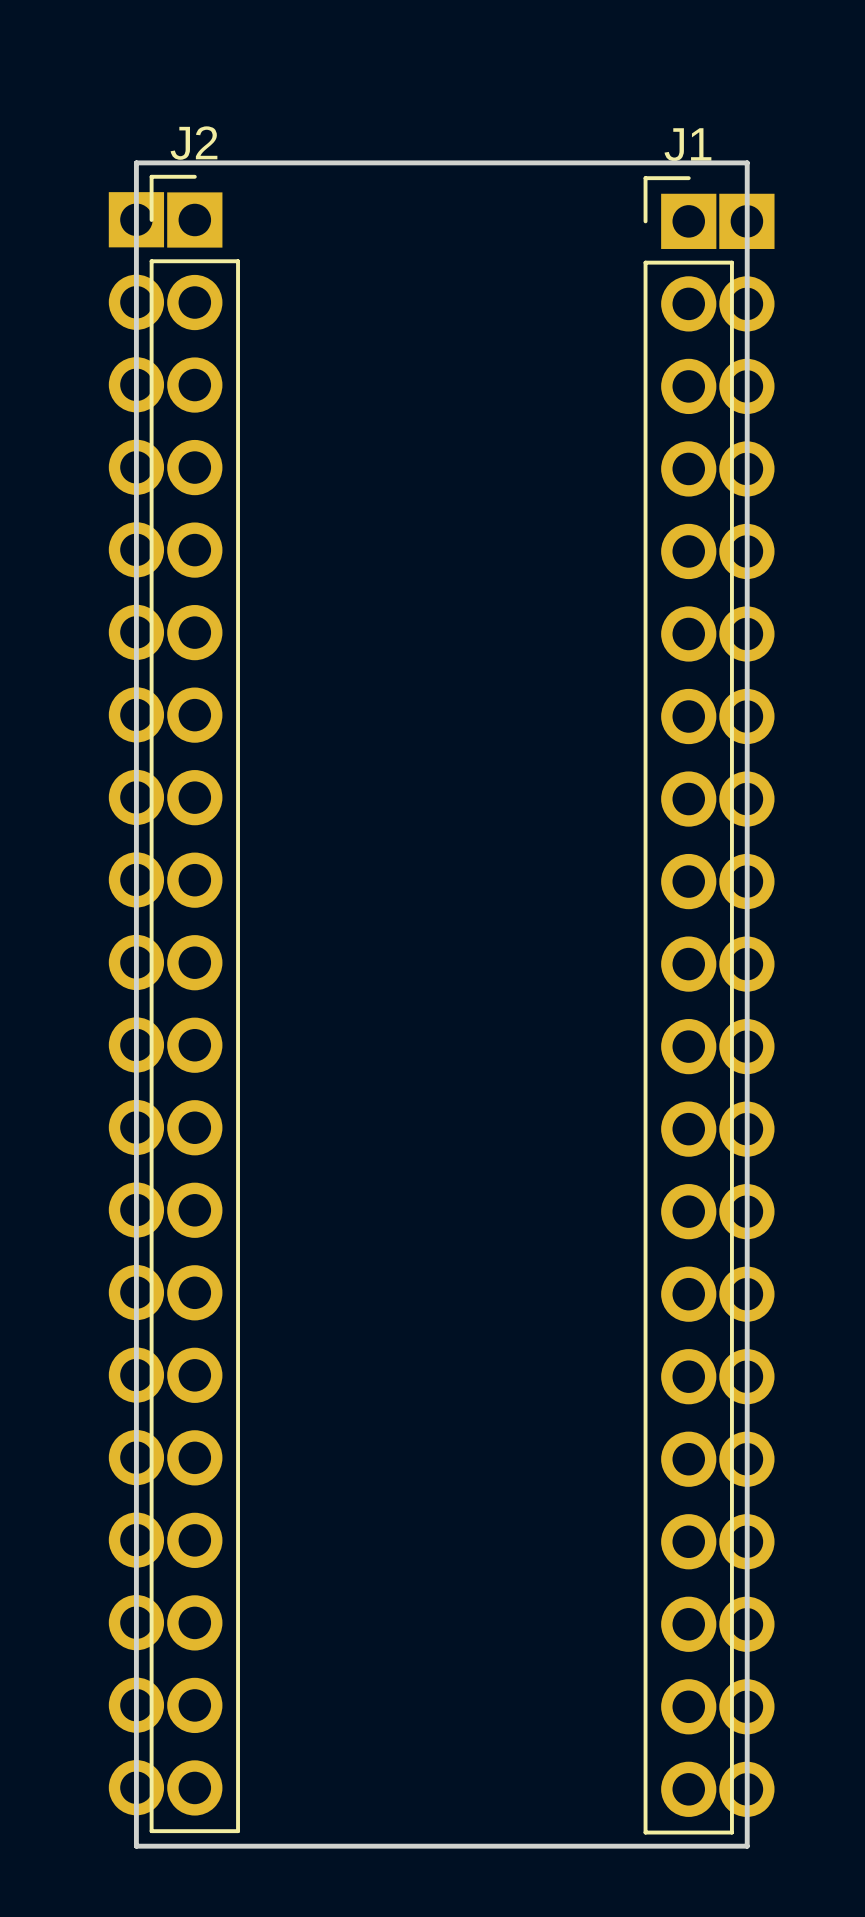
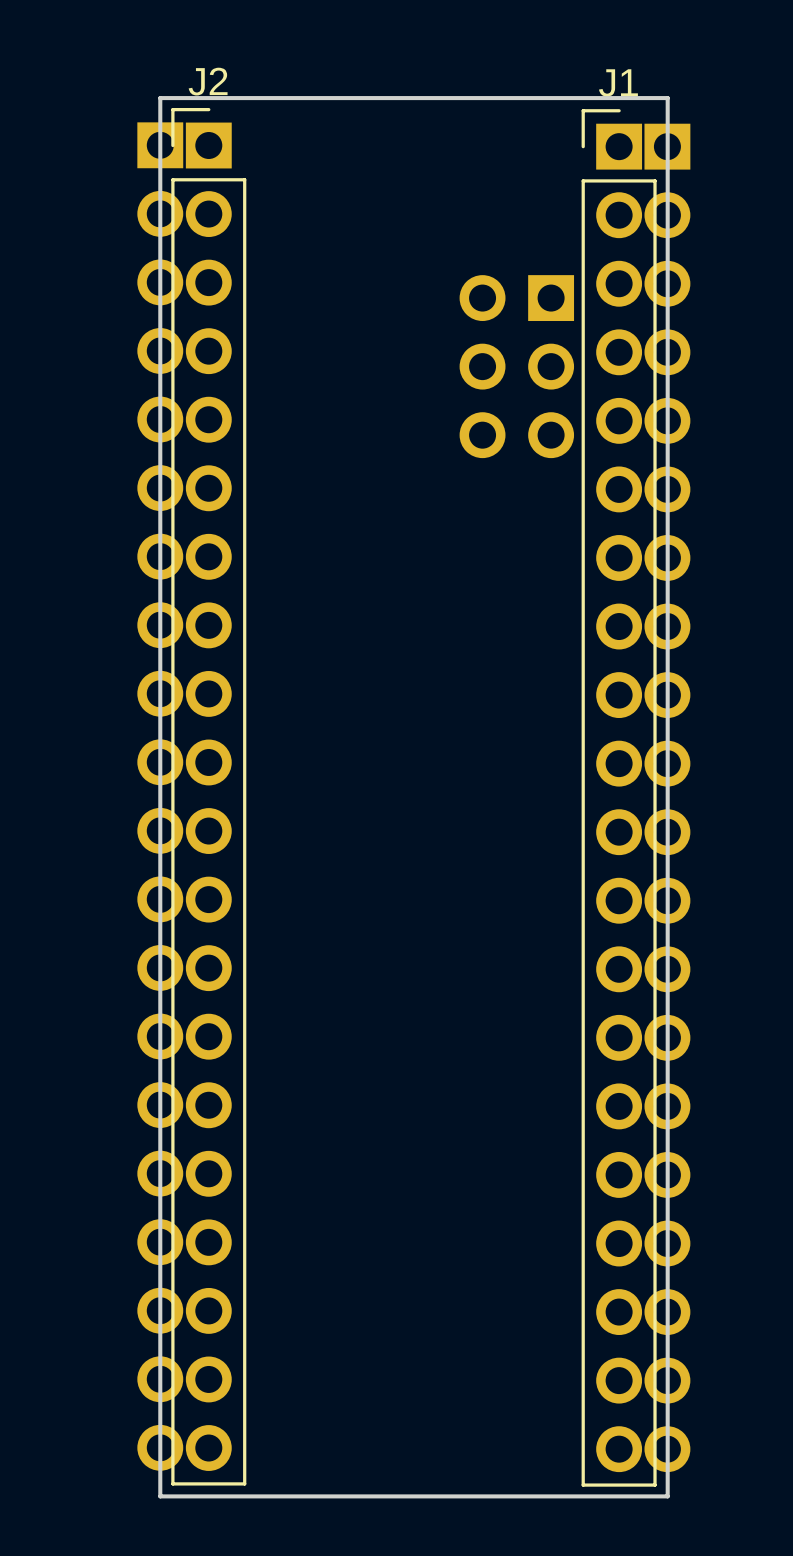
part: none -> (516, 366)

